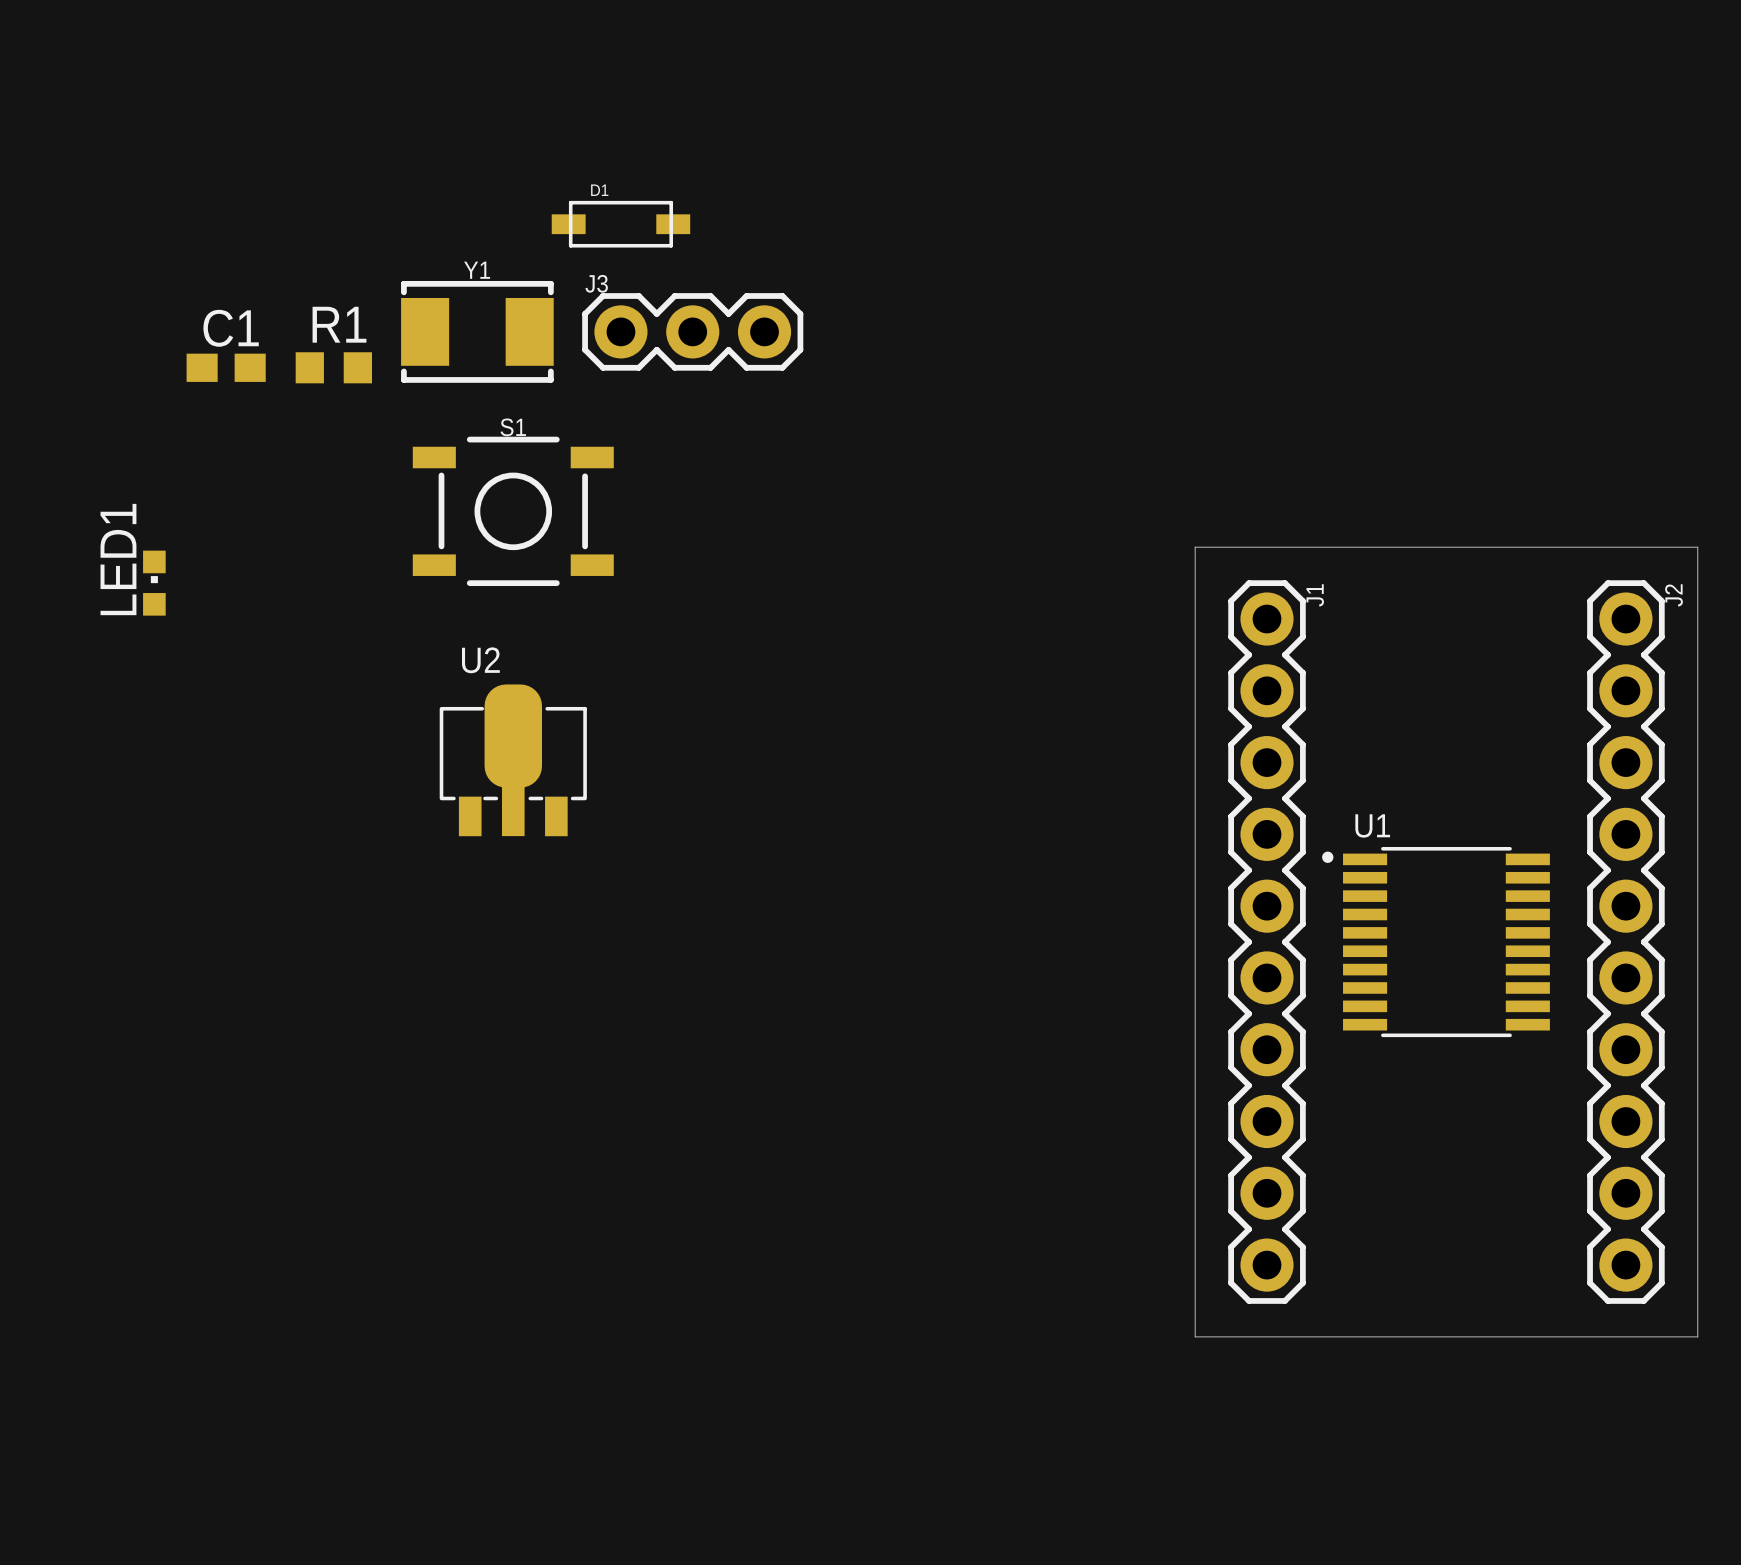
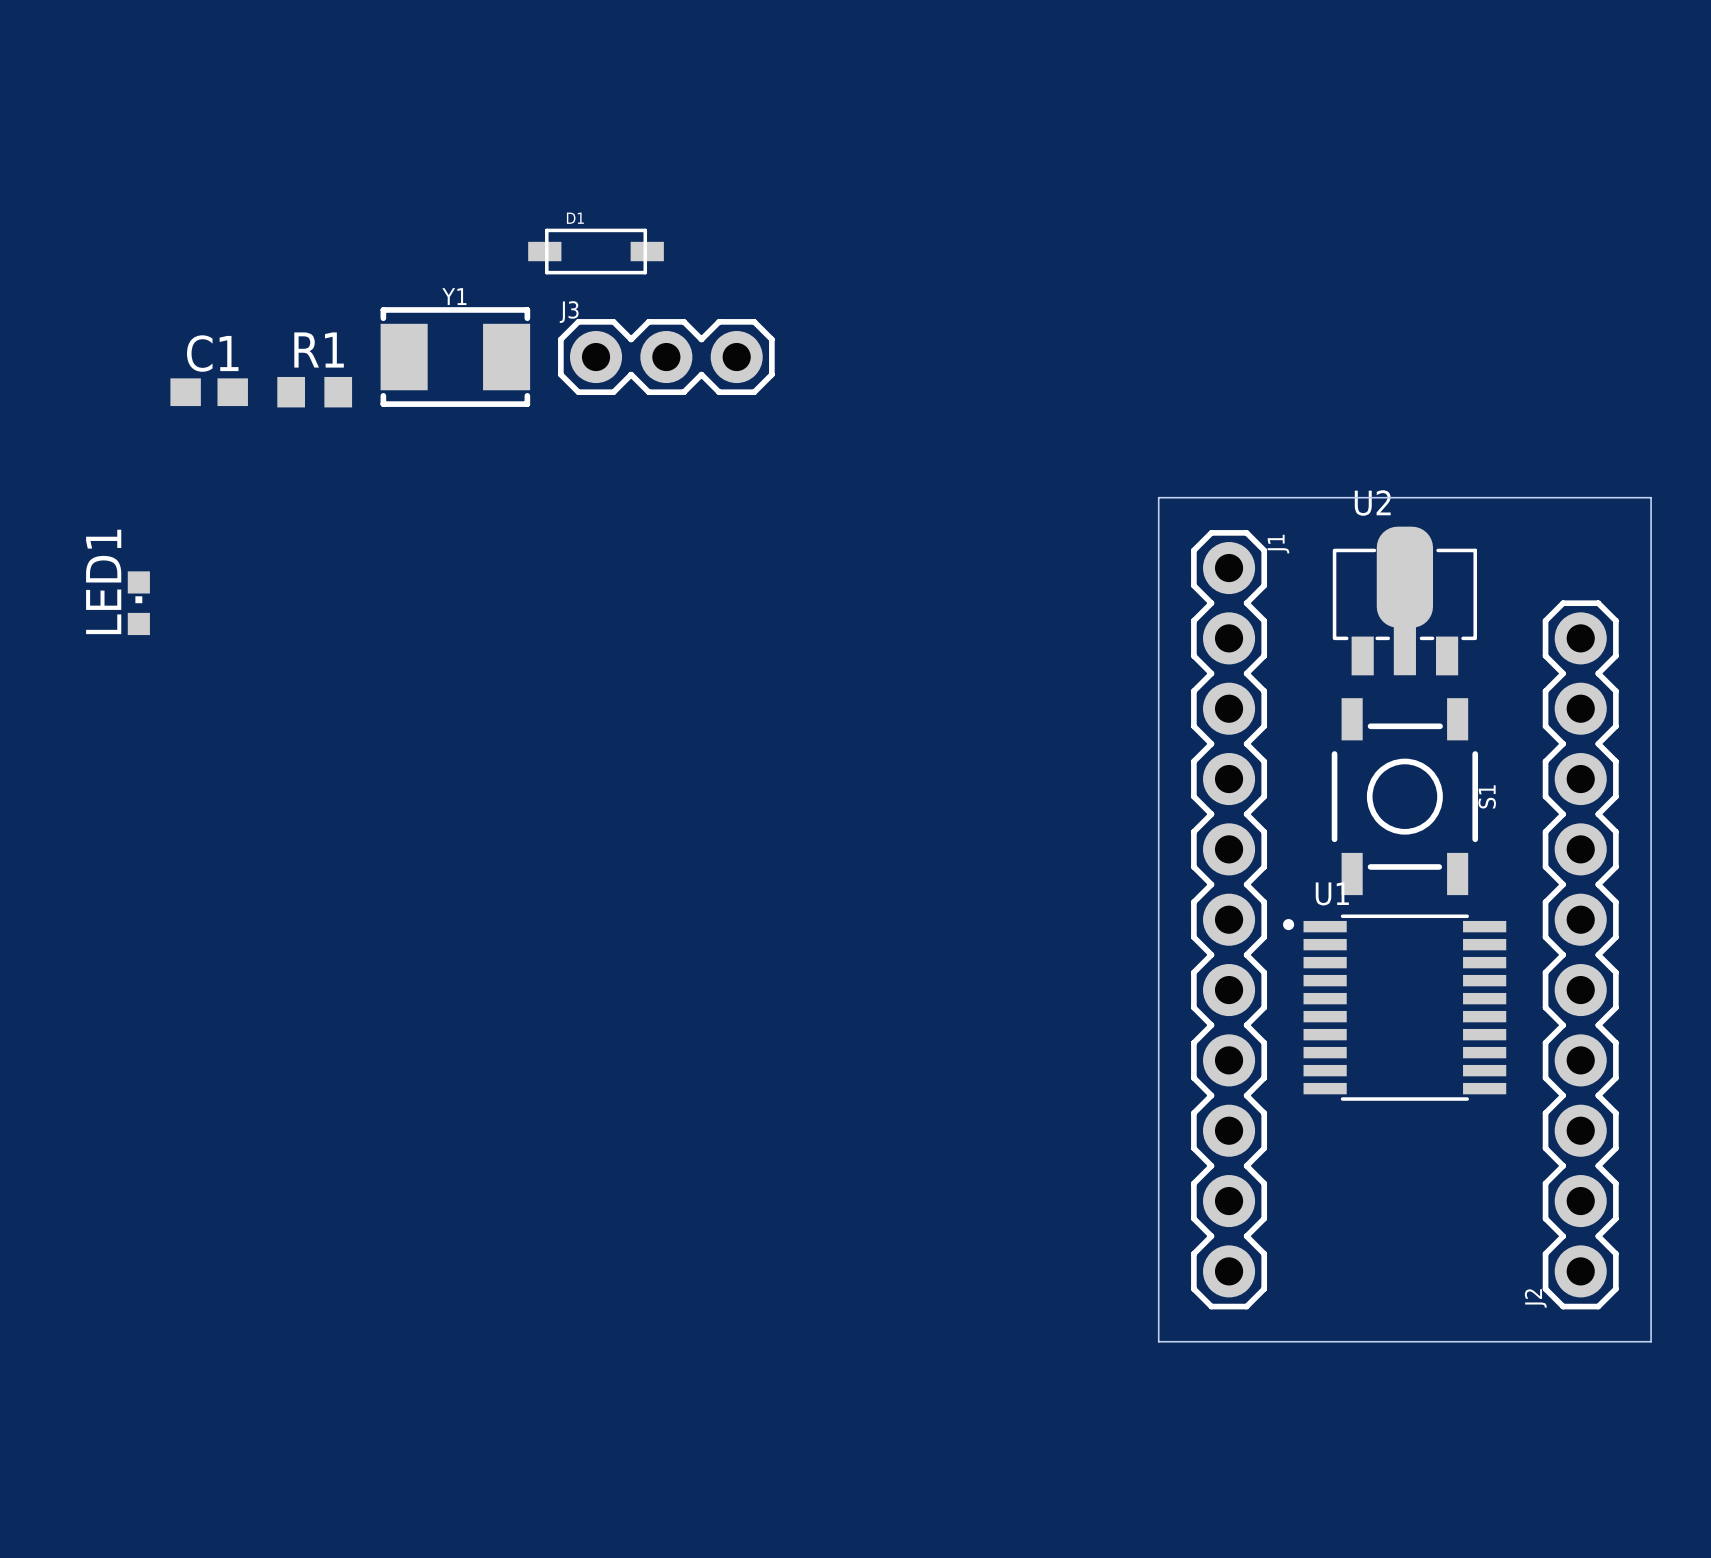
S1 rotation: 0° (513, 511) -> 90° clockwise (1404, 796)
S1 position: (513, 511) -> (1404, 796)
board edge: (1195, 547) (1697, 547) -> (1158, 568) (1158, 497) (1651, 497) (1651, 568)
J1 footprint: [1228, 580, 1306, 1304] -> [1191, 530, 1268, 1310]
J2 name position: J2 (1674, 595) -> J2 (1535, 1298)
U2 position: (513, 760) -> (1404, 600)
U1 position: (1436, 942) -> (1394, 1007)

